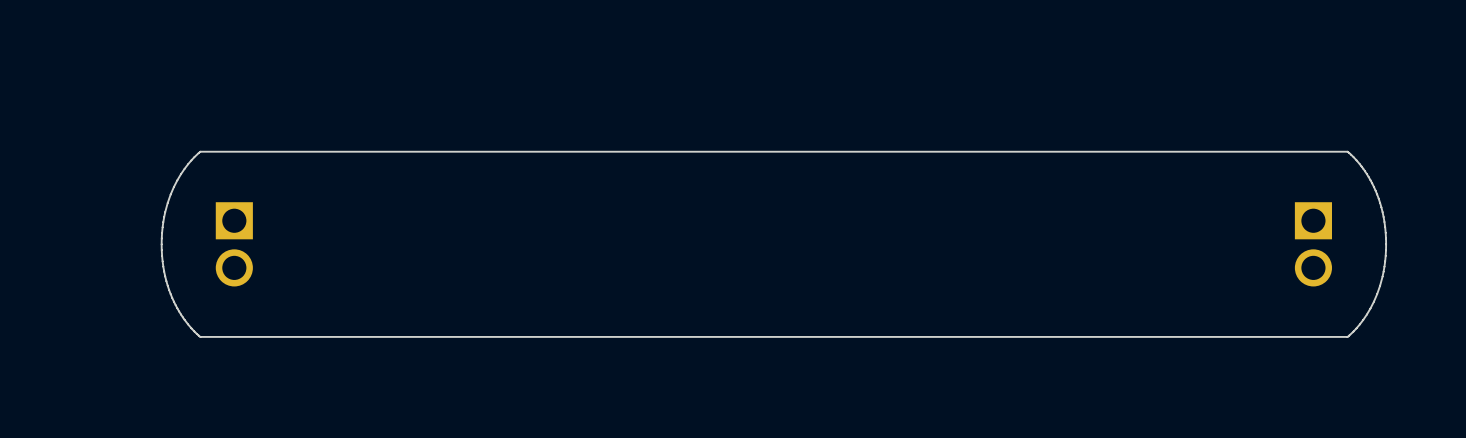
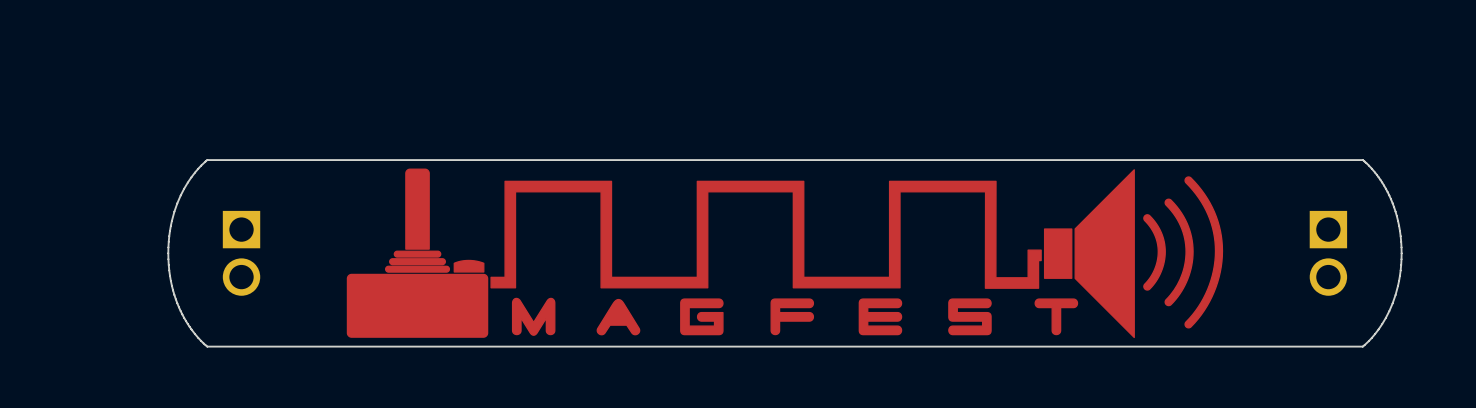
drawing: none -> [346, 168, 1224, 339]

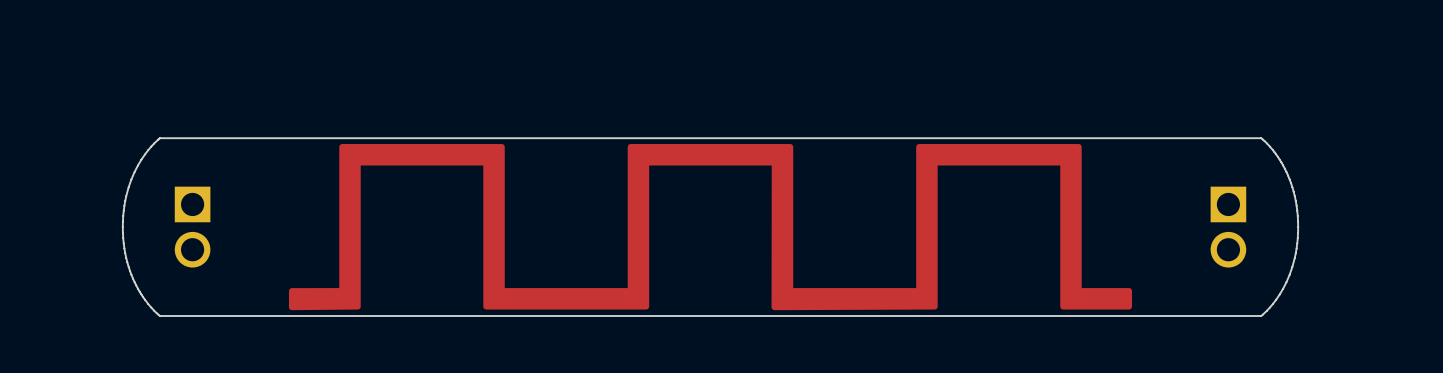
drawing: [346, 168, 724, 338] -> none
drawing: [948, 169, 1224, 339] -> none
drawing shape: [490, 180, 1042, 289] -> [288, 144, 1133, 311]
drawing: [770, 298, 903, 336] -> none

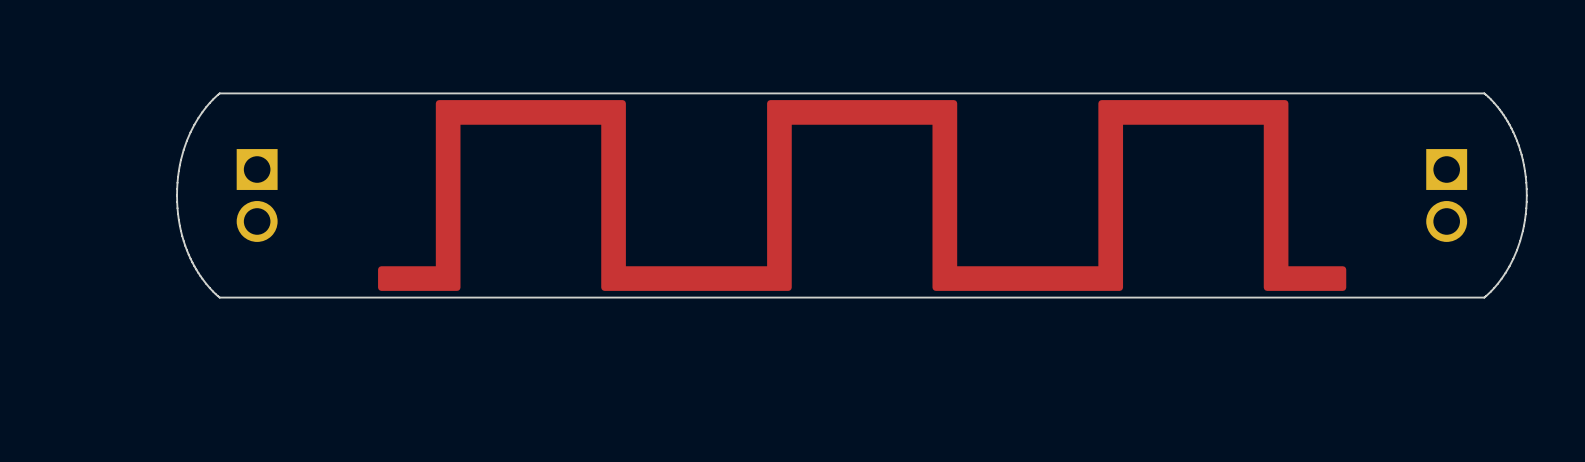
drawing shape: [288, 144, 1133, 311] -> [378, 100, 1347, 291]

